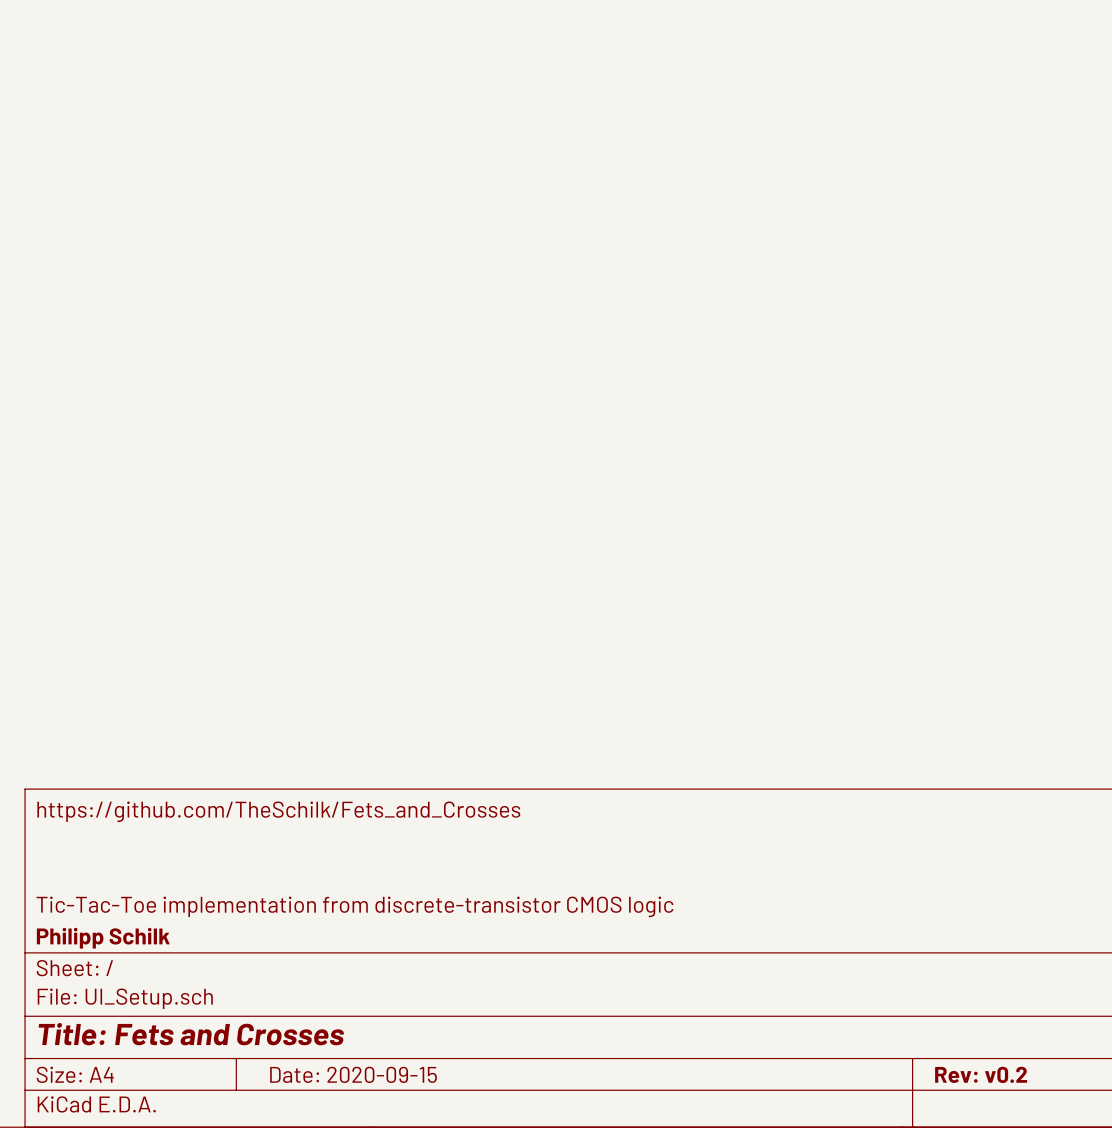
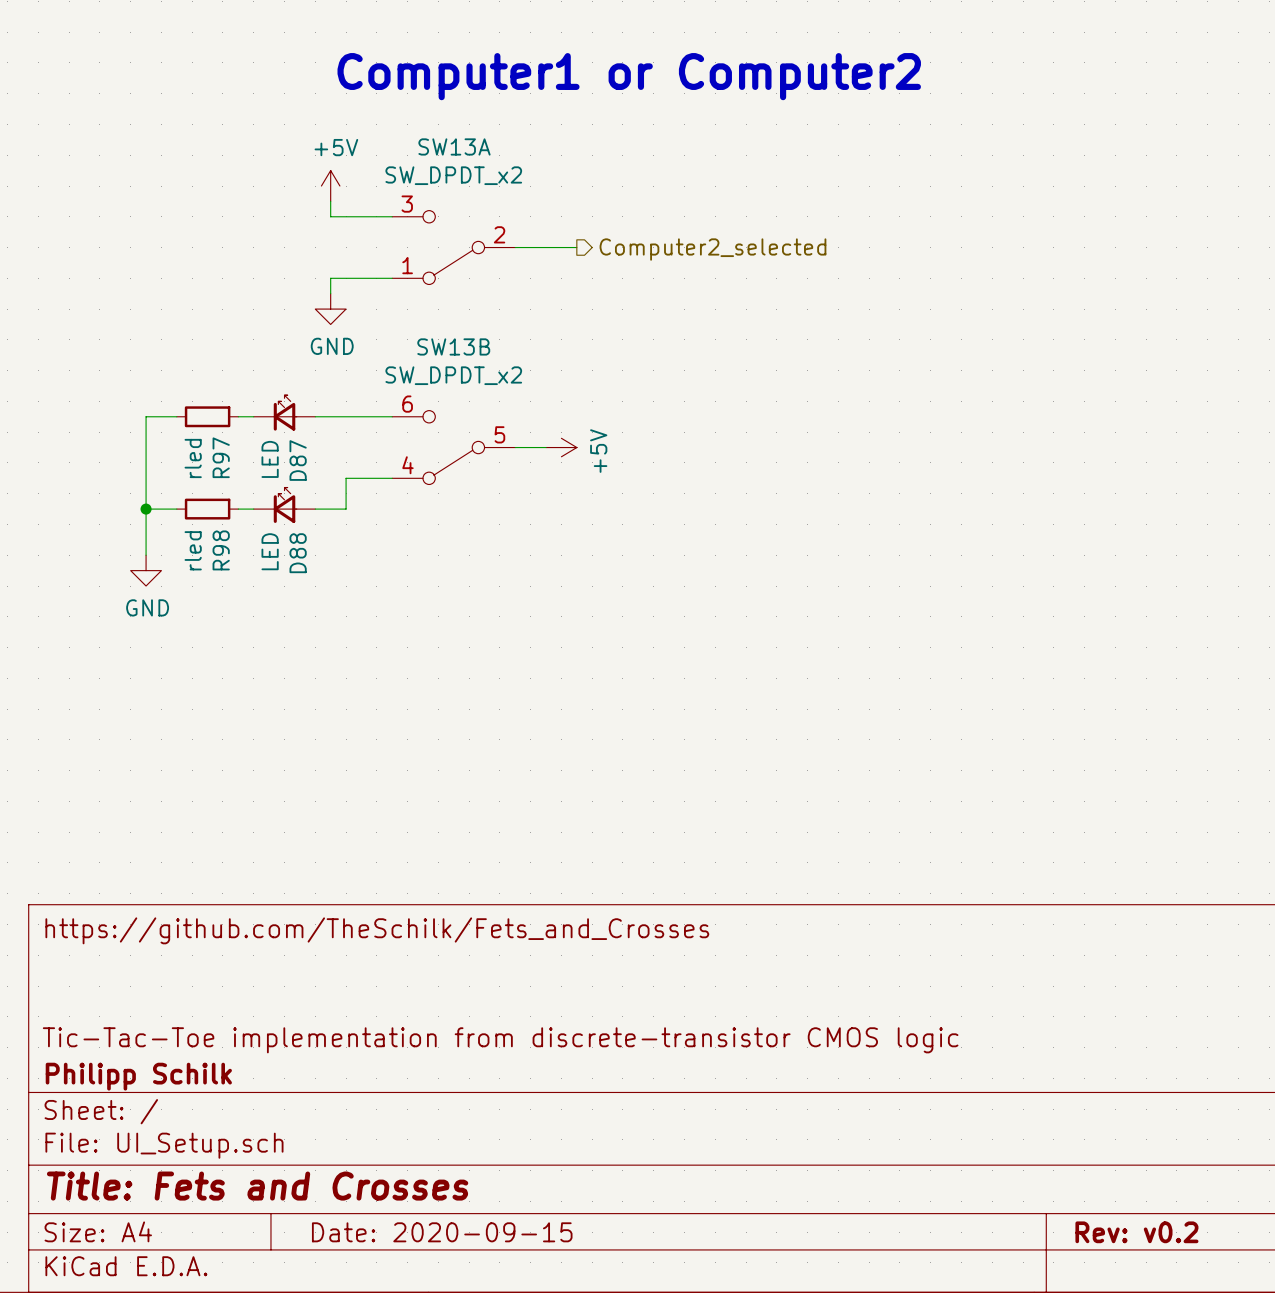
text: none -> Computer1 or Computer2 (629, 76)
power symbol: none -> +5V (330, 186)
wire: none -> (330, 201) (330, 216) (392, 216)
SW13A: none -> SW_DPDT_x2 (453, 247)
wire: none -> (515, 247) (576, 247)
hierarchical label: none -> Computer2_selected (712, 249)
wire: none -> (392, 278) (330, 278) (330, 293)
power symbol: none -> GND (330, 309)
D87: none -> LED (284, 412)
wire: none -> (176, 416) (146, 416) (146, 555)
R97: none -> rled (207, 416)
wire: none -> (238, 416) (253, 416)
wire: none -> (315, 416) (392, 416)
SW13B: none -> SW_DPDT_x2 (453, 447)
wire: none -> (515, 447) (546, 447)
power symbol: none -> +5V (561, 447)
wire: none -> (392, 478) (346, 478) (346, 509) (315, 509)
D88: none -> LED (284, 505)
wire: none -> (146, 509) (176, 509)
junction: none -> (146, 509)
R98: none -> rled (207, 509)
wire: none -> (238, 509) (253, 509)
power symbol: none -> GND (146, 570)

